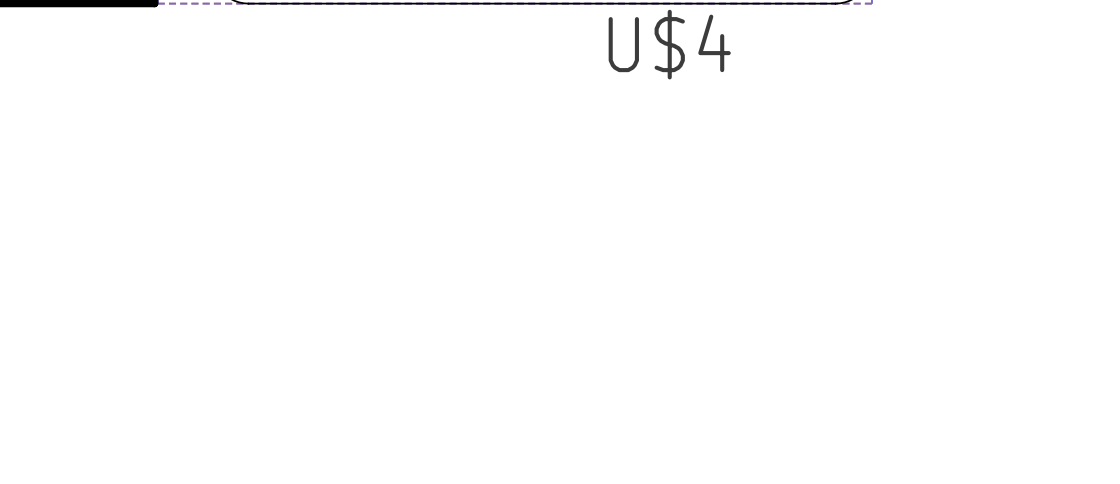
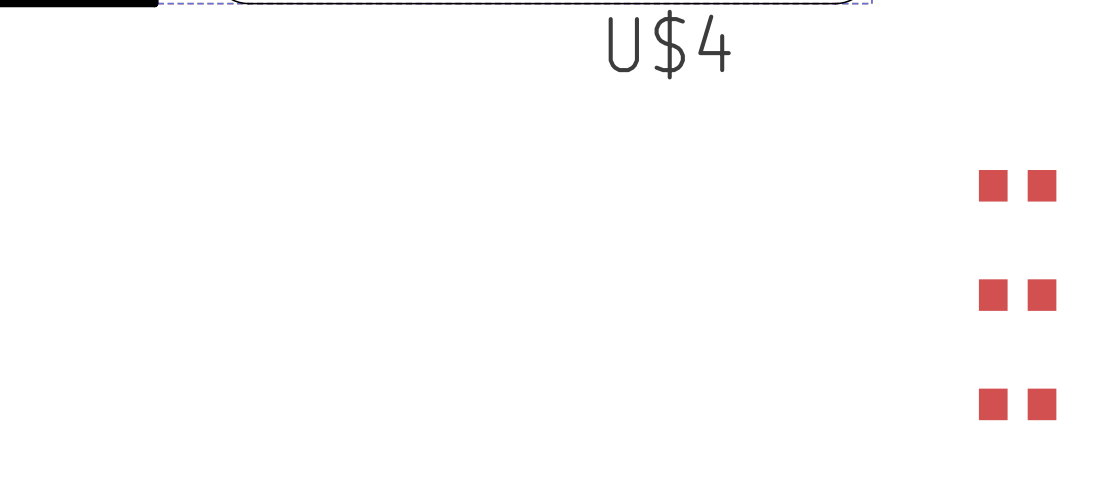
part: none -> (1017, 185)
part: none -> (1017, 295)
part: none -> (1017, 404)

